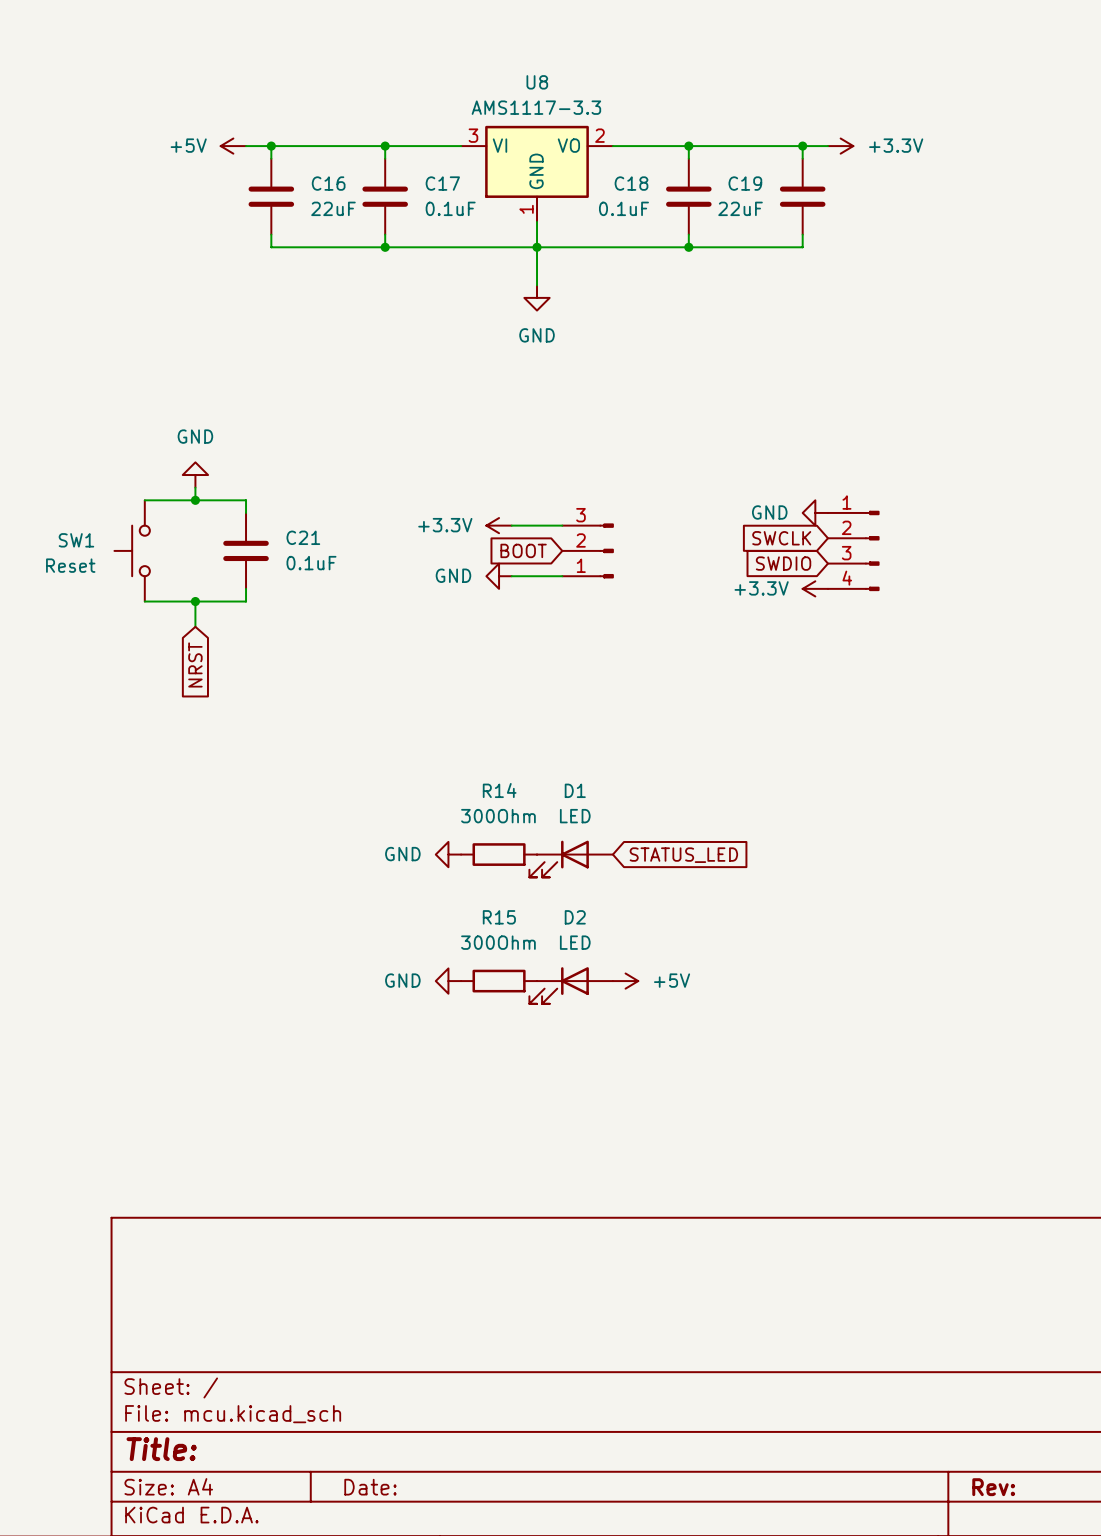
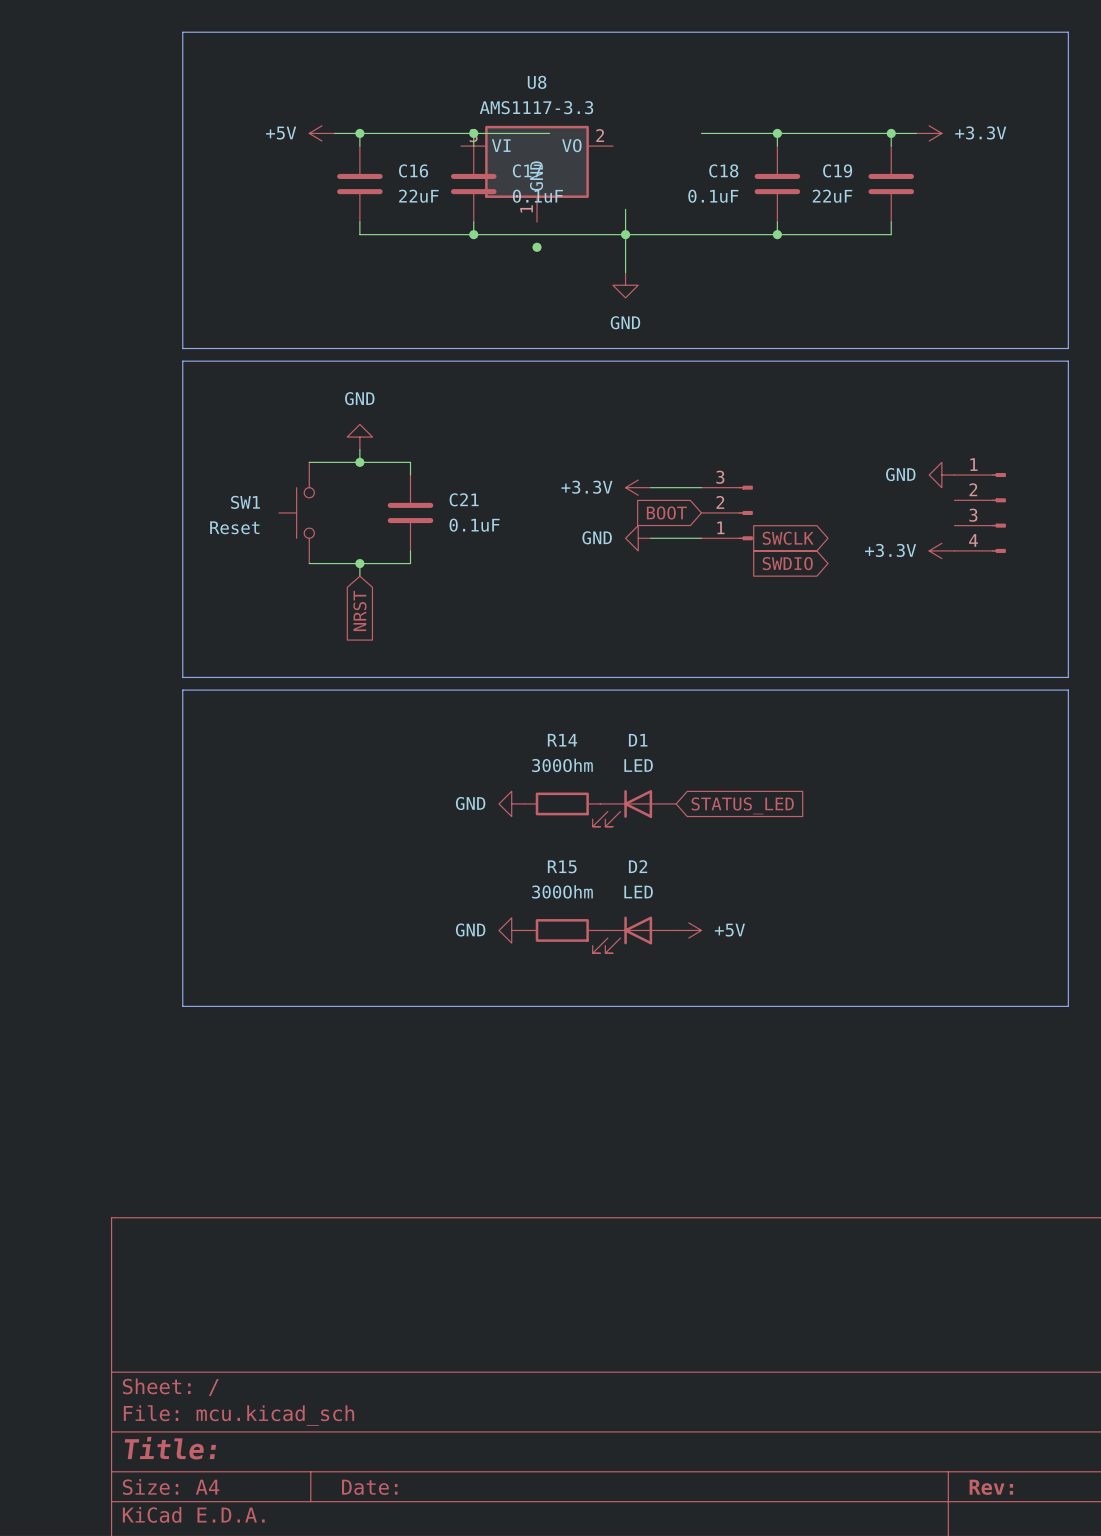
line: none -> (182, 32) (182, 348) (1068, 348) (1068, 32) (182, 32)
junction: none -> (473, 133)
junction: none -> (891, 133)
power symbol position: +5V (233, 146) -> +5V (321, 133)
wire: (246, 146) (461, 146) -> (334, 133) (549, 133)
wire: (271, 146) (271, 158) -> (359, 133) (359, 146)
junction: (271, 146) -> none
wire: (385, 146) (385, 158) -> (473, 133) (473, 146)
junction position: (385, 146) -> (359, 133)
wire: (612, 146) (827, 146) -> (701, 133) (916, 133)
wire: (688, 146) (688, 158) -> (777, 133) (777, 146)
junction: (688, 146) -> none
wire: (802, 146) (802, 158) -> (891, 133) (891, 146)
junction position: (802, 146) -> (777, 133)
power symbol position: +3.3V (840, 146) -> +3.3V (929, 133)
C16 position: (271, 196) -> (359, 184)
C17 position: (385, 196) -> (473, 184)
C18 position: (688, 196) -> (777, 184)
C19 position: (802, 196) -> (891, 184)
wire: (537, 221) (537, 285) -> (625, 209) (625, 272)
wire: (271, 234) (271, 247) (802, 247) (802, 234) -> (359, 221) (359, 234) (891, 234) (891, 221)
wire: (385, 234) (385, 247) -> (473, 221) (473, 234)
junction: none -> (473, 234)
junction: none -> (625, 234)
wire: (688, 234) (688, 247) -> (777, 221) (777, 234)
junction: none -> (777, 234)
junction: (385, 247) -> none
junction: (688, 247) -> none
power symbol position: GND (537, 297) -> GND (625, 285)
line: none -> (182, 361) (1068, 361) (1068, 677) (182, 677) (182, 361)
power symbol: none -> GND (359, 437)
junction: none -> (359, 462)
power symbol: GND (195, 475) -> none
power symbol: none -> GND (941, 475)
wire: (195, 487) (195, 500) -> (359, 449) (359, 462)
power symbol: none -> +3.3V (638, 487)
wire: (144, 500) (246, 500) (246, 512) -> (309, 462) (410, 462) (410, 475)
junction: (195, 500) -> none
power symbol: GND (815, 512) -> none
power symbol: +3.3V (499, 525) -> none
wire: (511, 525) (562, 525) -> (650, 487) (701, 487)
power symbol: none -> GND (638, 538)
SW1 position: (132, 550) -> (296, 512)
C21 position: (246, 550) -> (410, 512)
global label position: BOOT (523, 550) -> BOOT (666, 512)
part position: (587, 550) -> (727, 512)
part position: (853, 550) -> (980, 512)
power symbol: none -> +3.3V (941, 550)
wire: none -> (359, 563) (359, 576)
junction: none -> (359, 563)
power symbol: GND (499, 576) -> none
wire: (511, 576) (562, 576) -> (650, 538) (701, 538)
wire: (246, 588) (246, 601) (144, 601) -> (410, 550) (410, 563) (309, 563)
power symbol: +3.3V (815, 588) -> none
wire: (195, 601) (195, 626) -> none
junction: (195, 601) -> none
global label position: NRST (195, 664) -> NRST (359, 610)
line: none -> (182, 690) (182, 1006) (1068, 1006) (1068, 690) (182, 690)
power symbol: none -> GND (511, 803)
power symbol: GND (448, 854) -> none
R14 position: (499, 854) -> (562, 803)
global label position: STATUS_LED (683, 855) -> STATUS_LED (742, 805)
D1 position: (571, 858) -> (634, 808)
power symbol: none -> GND (511, 930)
power symbol: GND (448, 981) -> none
R15 position: (499, 981) -> (562, 930)
power symbol position: +5V (625, 981) -> +5V (688, 930)
D2 position: (571, 985) -> (634, 934)

